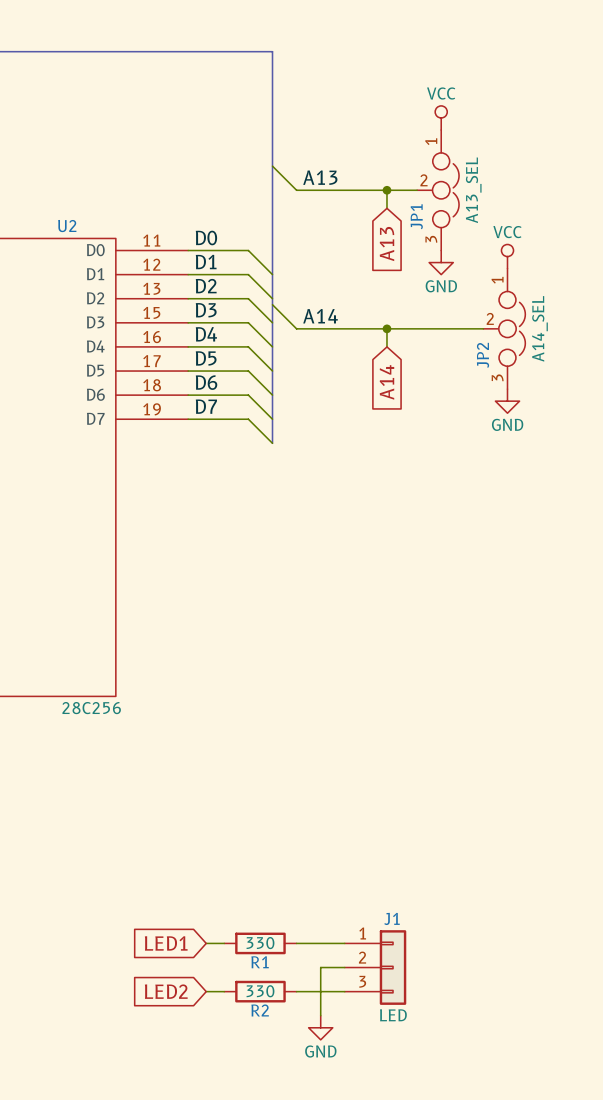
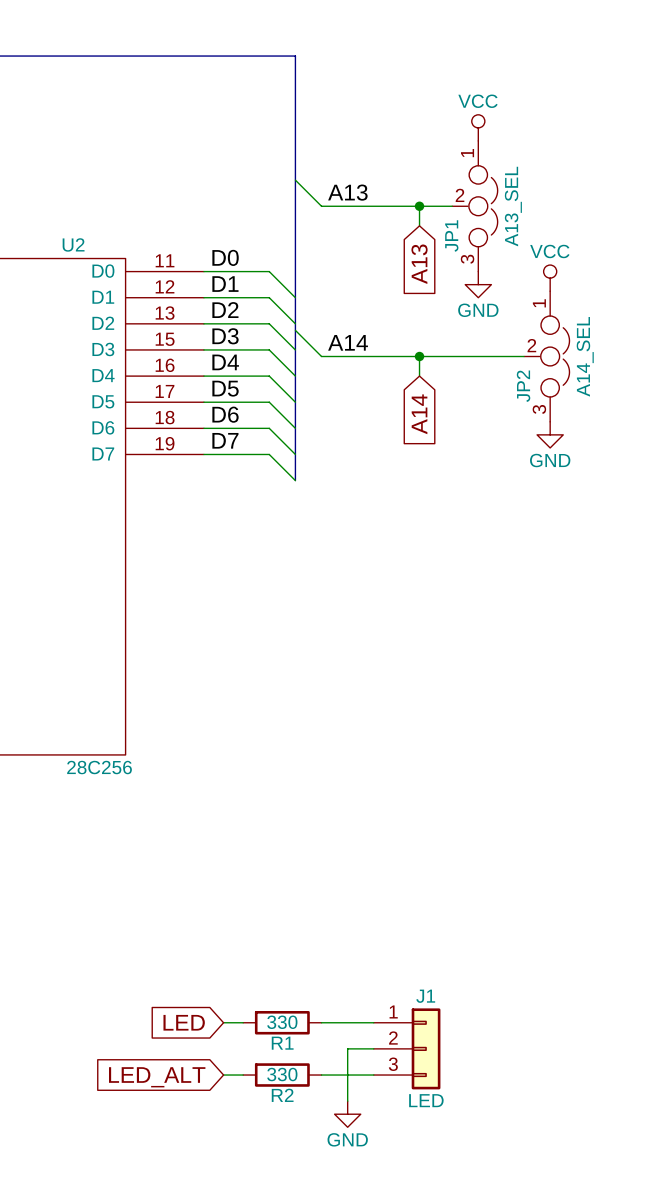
global label: LED1 (166, 943) -> LED (184, 1022)
global label: LED2 (166, 991) -> LED_ALT (157, 1077)

